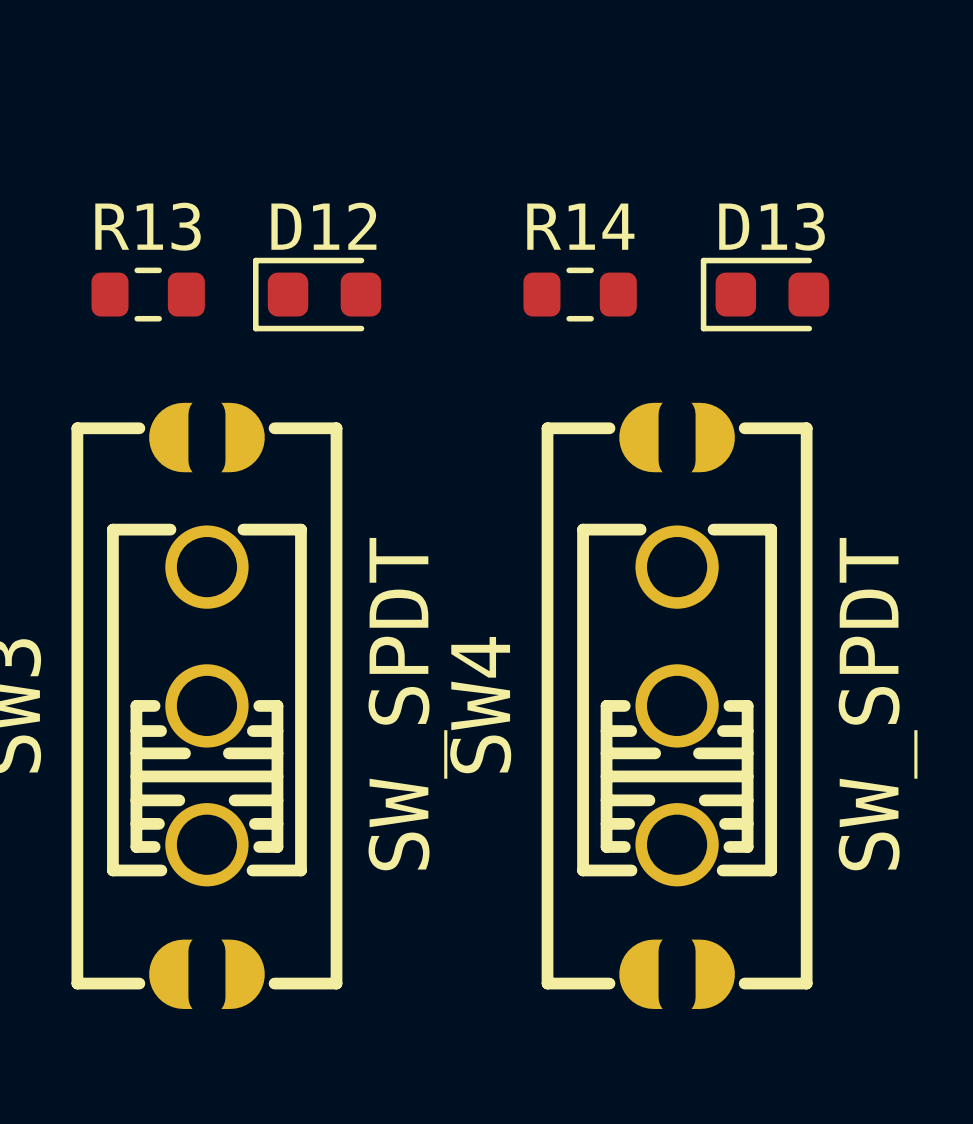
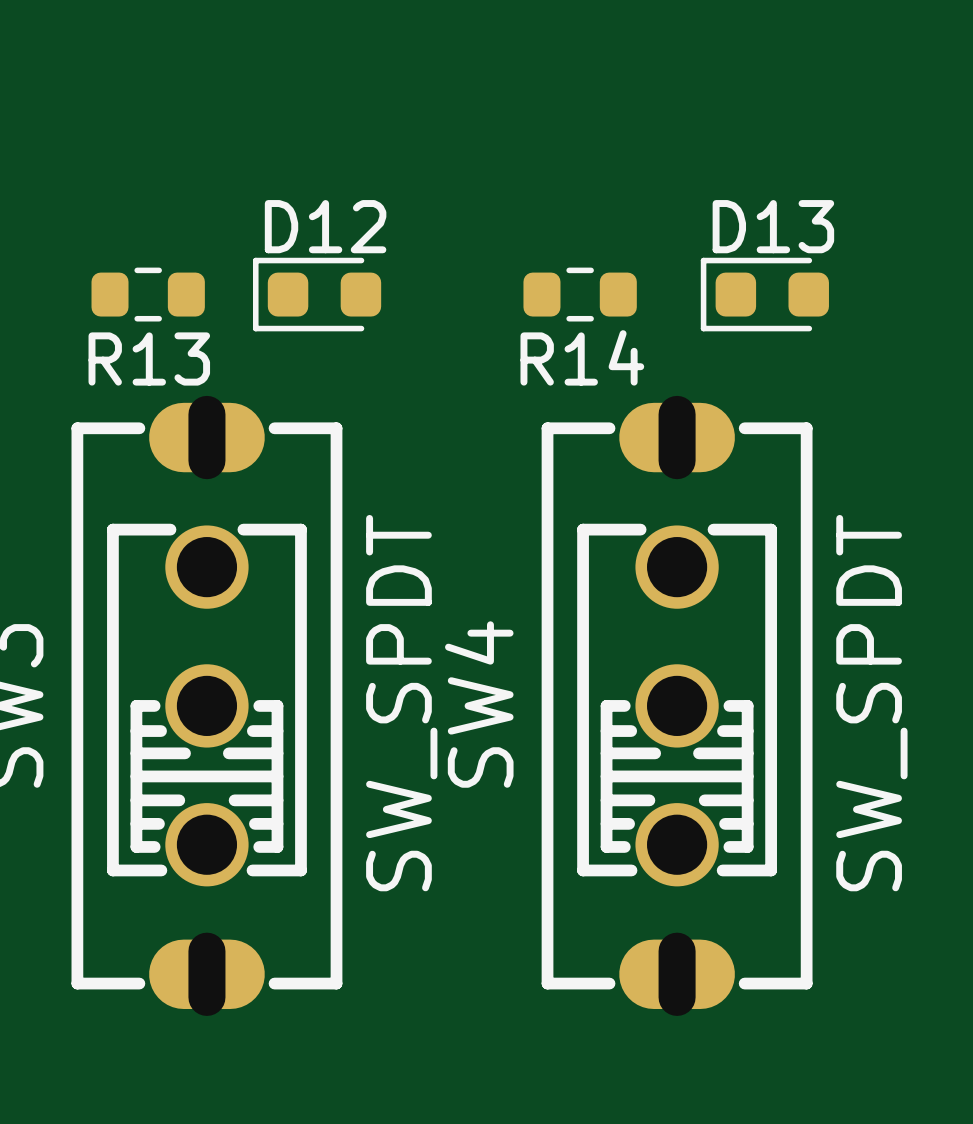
R13 name position: R13 (148, 226) -> R13 (149, 358)
R14 name position: R14 (580, 226) -> R14 (582, 357)

